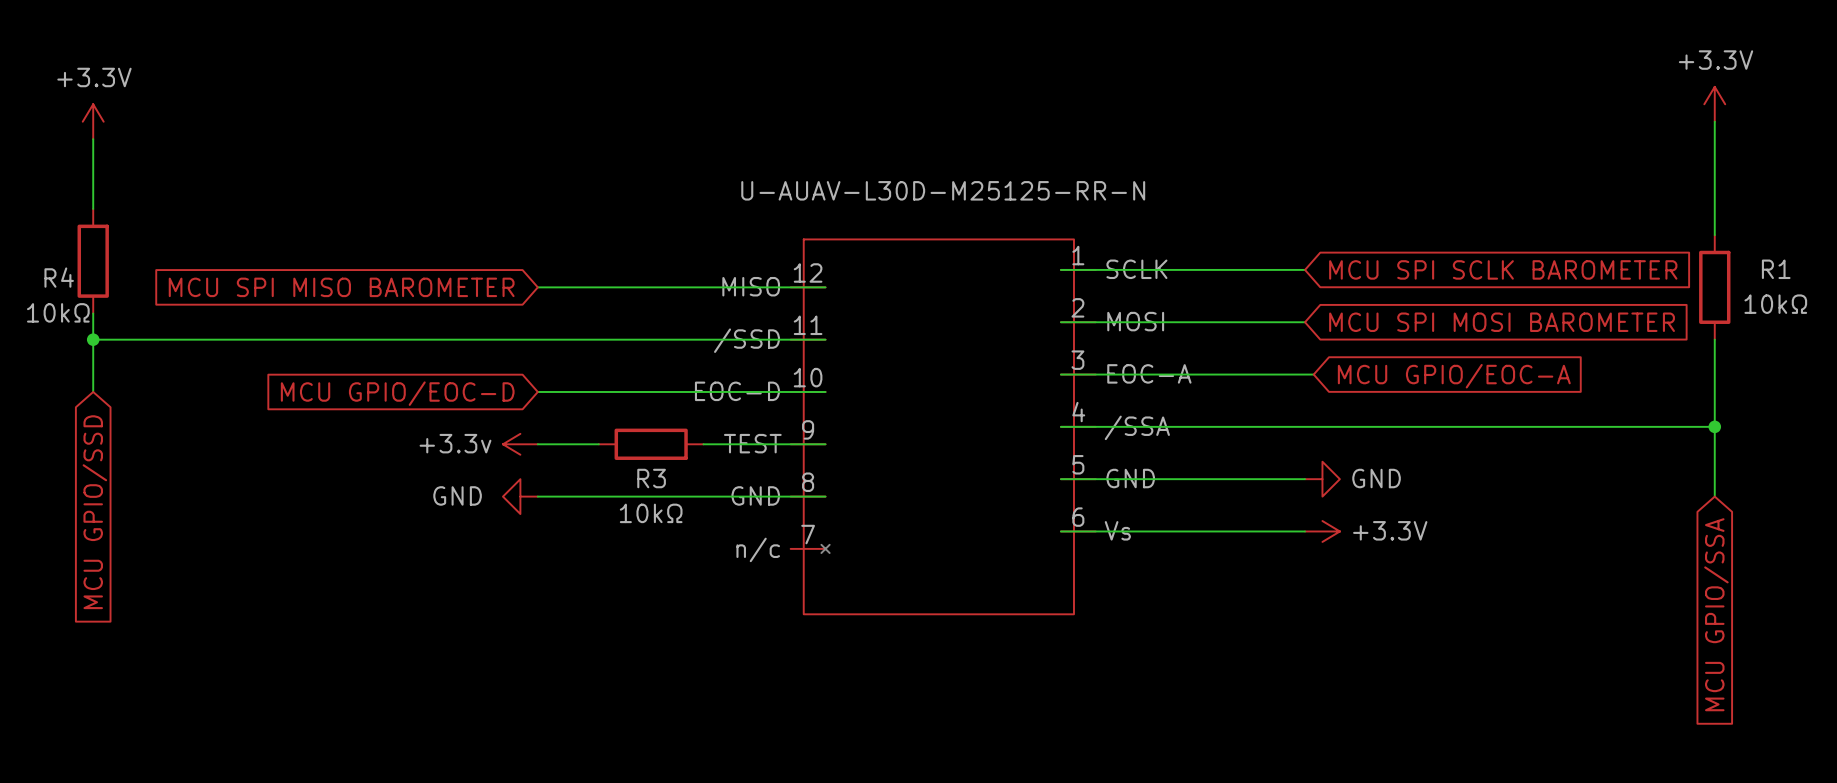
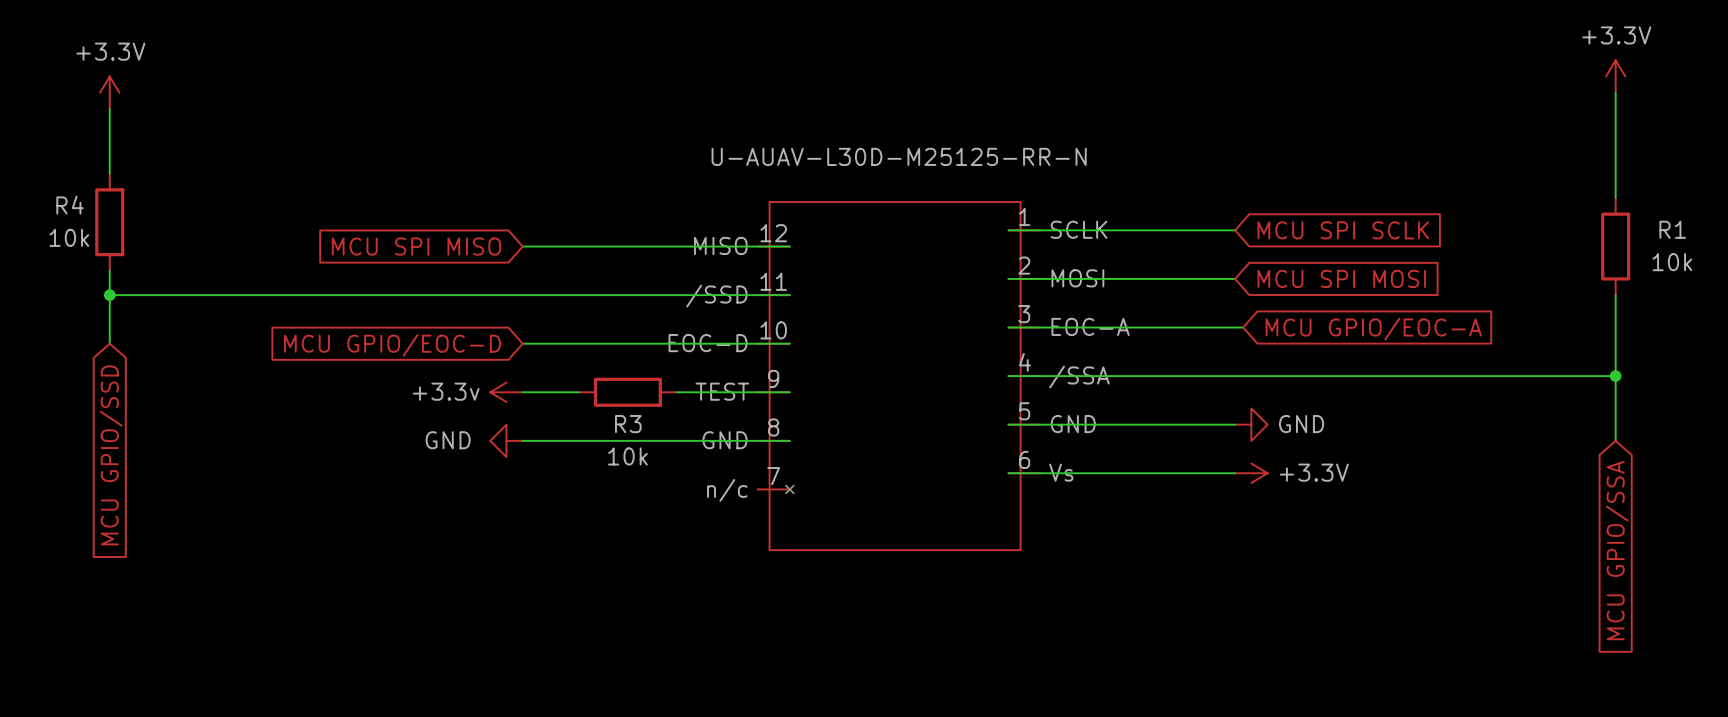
global label: MCU SPI SCLK BAROMETER (1503, 269) -> MCU SPI SCLK (1343, 230)
R4 name position: R4 (59, 277) -> R4 (70, 205)
global label: MCU SPI MISO BAROMETER (341, 287) -> MCU SPI MISO (416, 246)
R1 value: 10kΩ (1775, 304) -> 10k (1672, 262)
R4 value: 10kΩ (58, 312) -> 10k (69, 237)
global label: MCU SPI MOSI BAROMETER (1502, 322) -> MCU SPI MOSI (1341, 278)
R3 value: 10kΩ (651, 513) -> 10k (627, 456)

